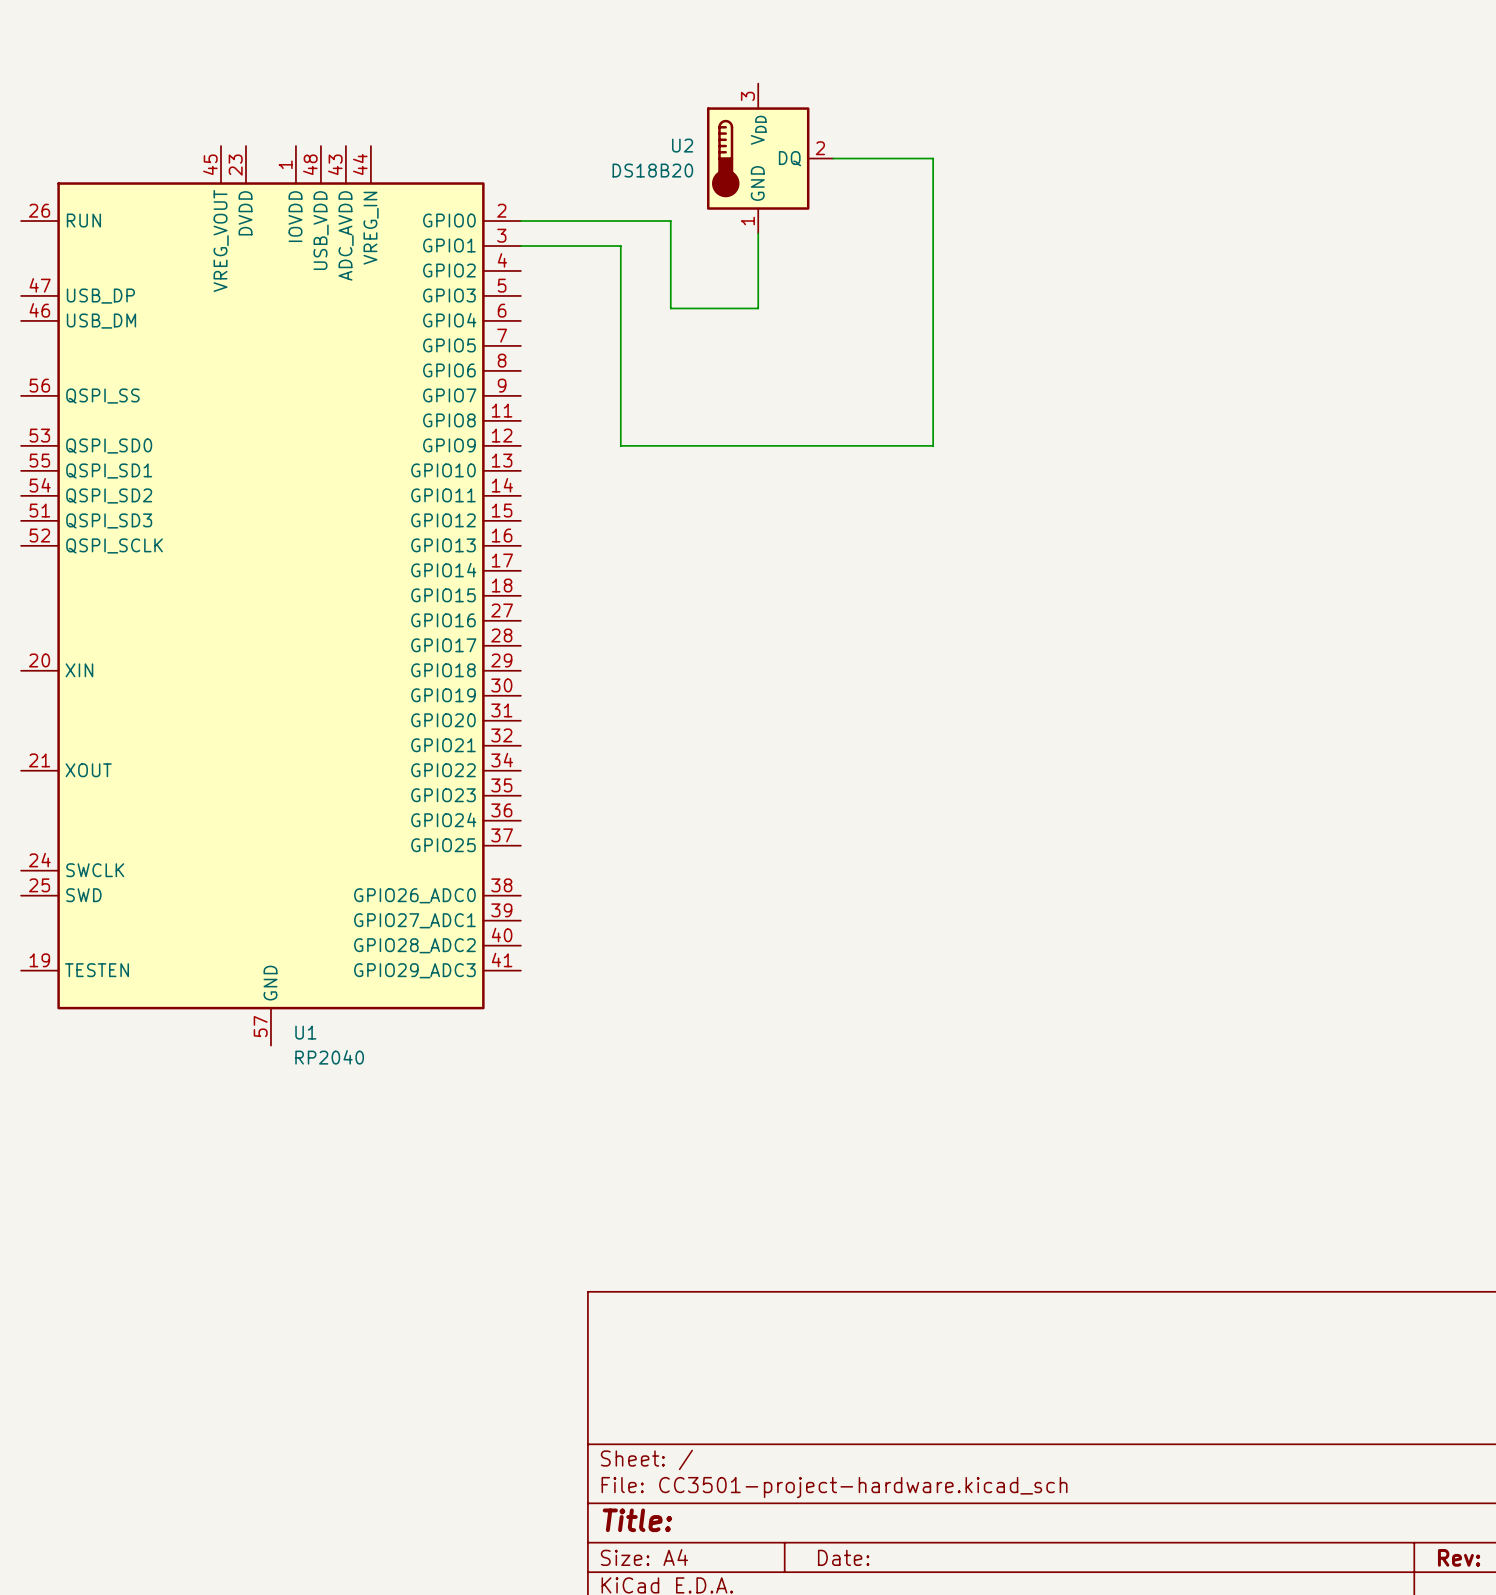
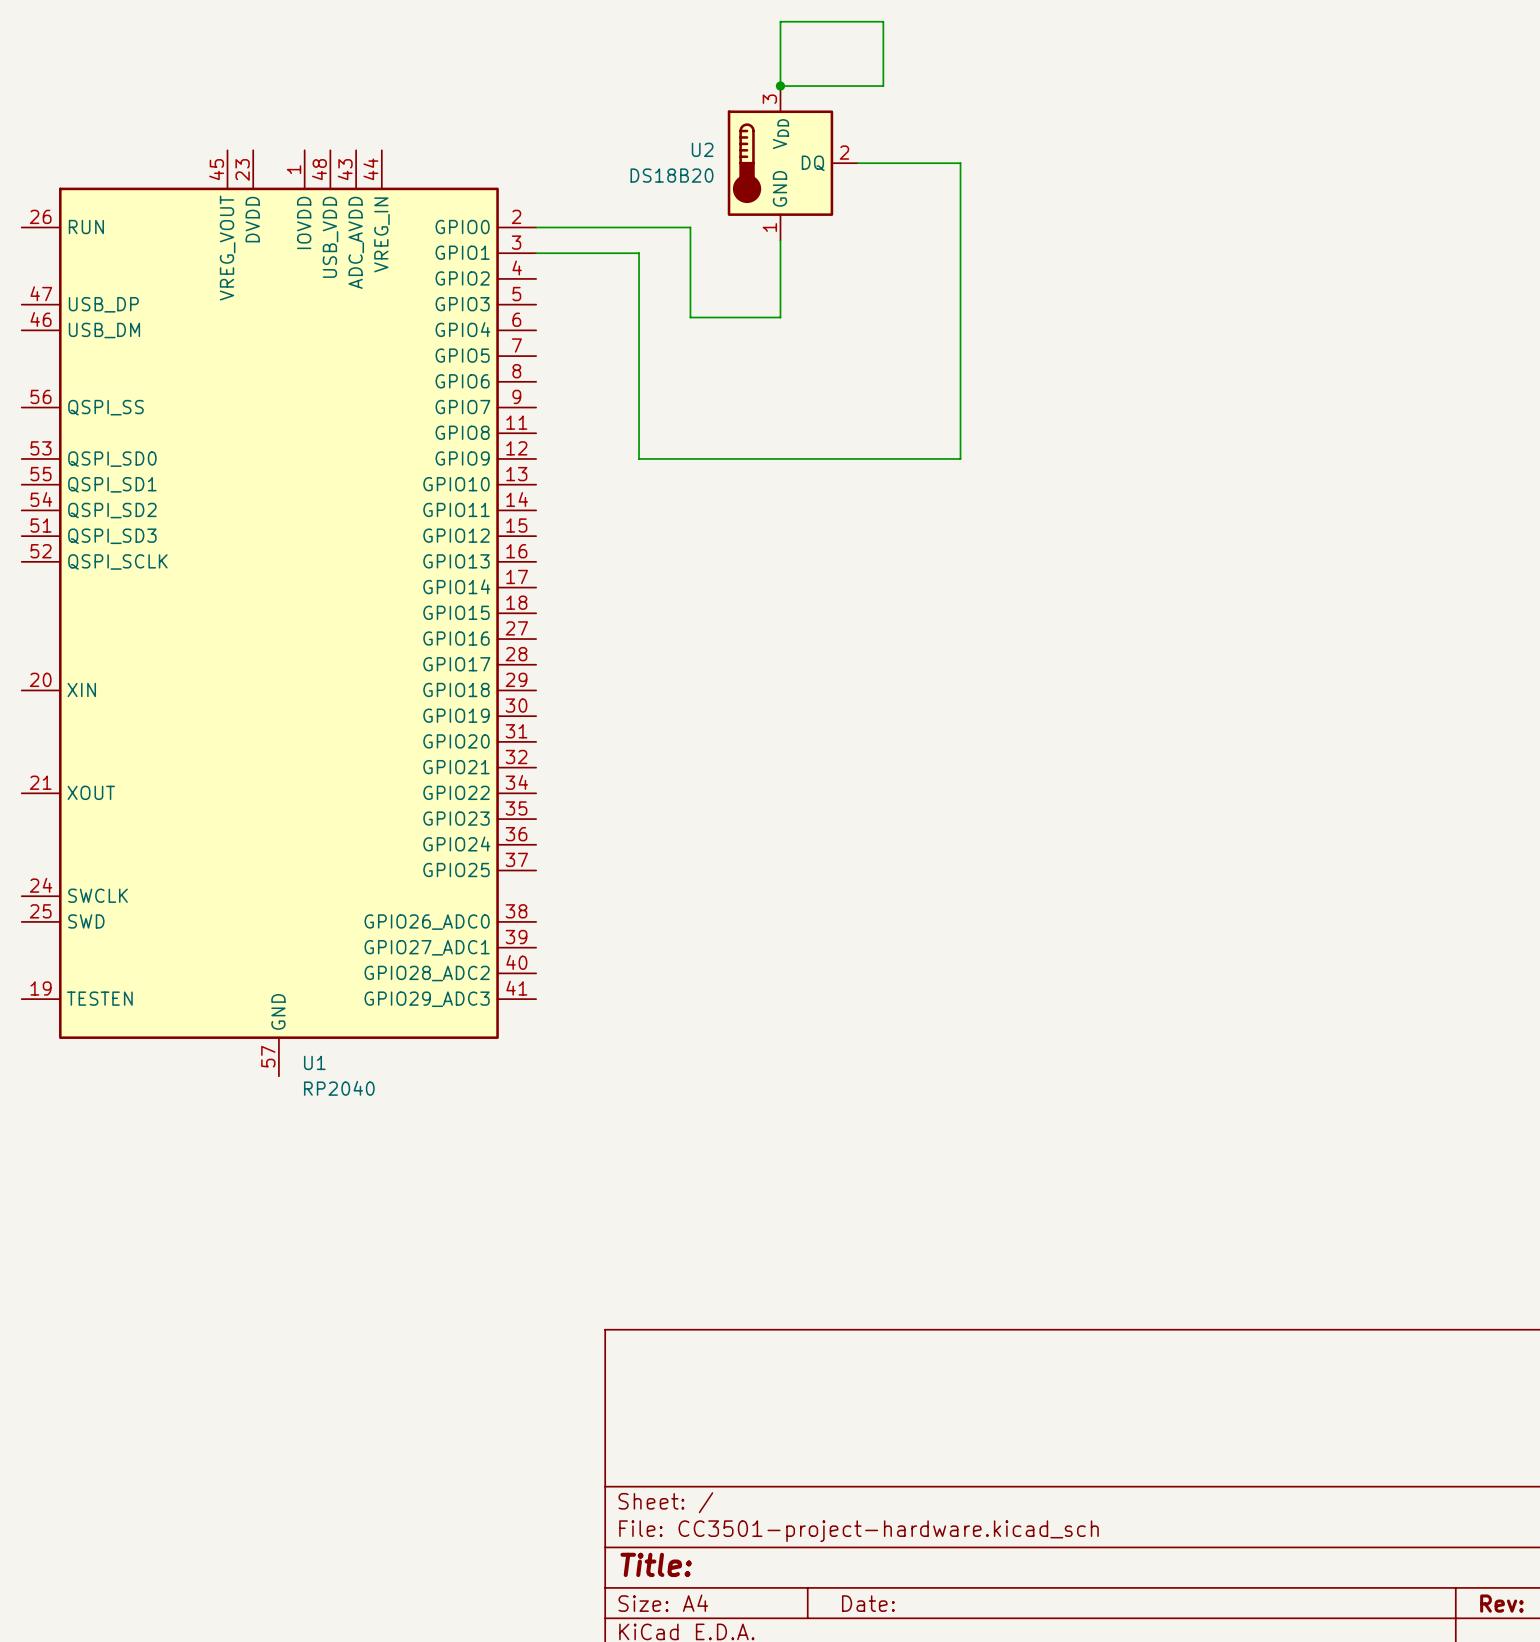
wire: none -> (780, 21) (780, 86) (883, 86) (883, 21) (780, 21)
junction: none -> (780, 86)

